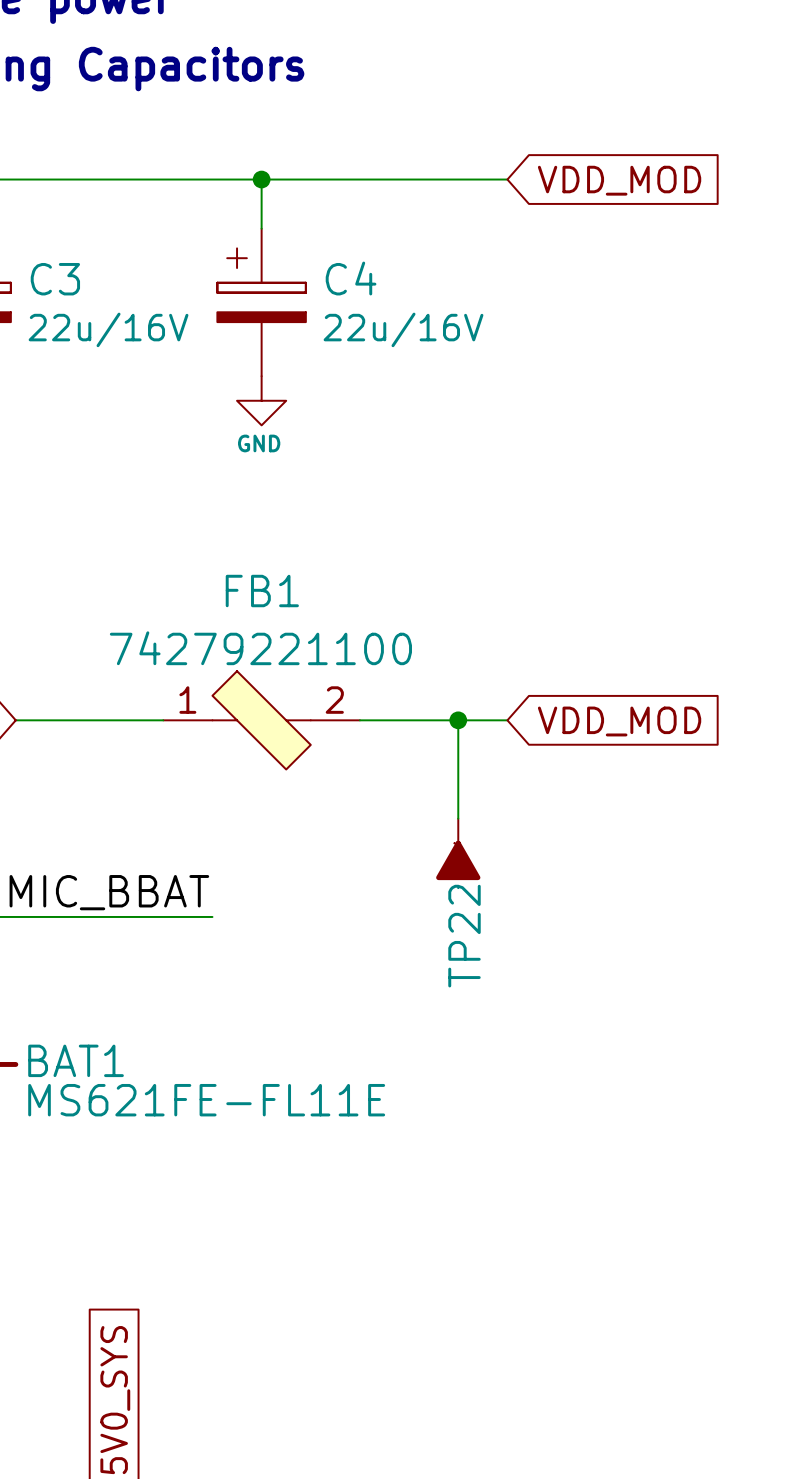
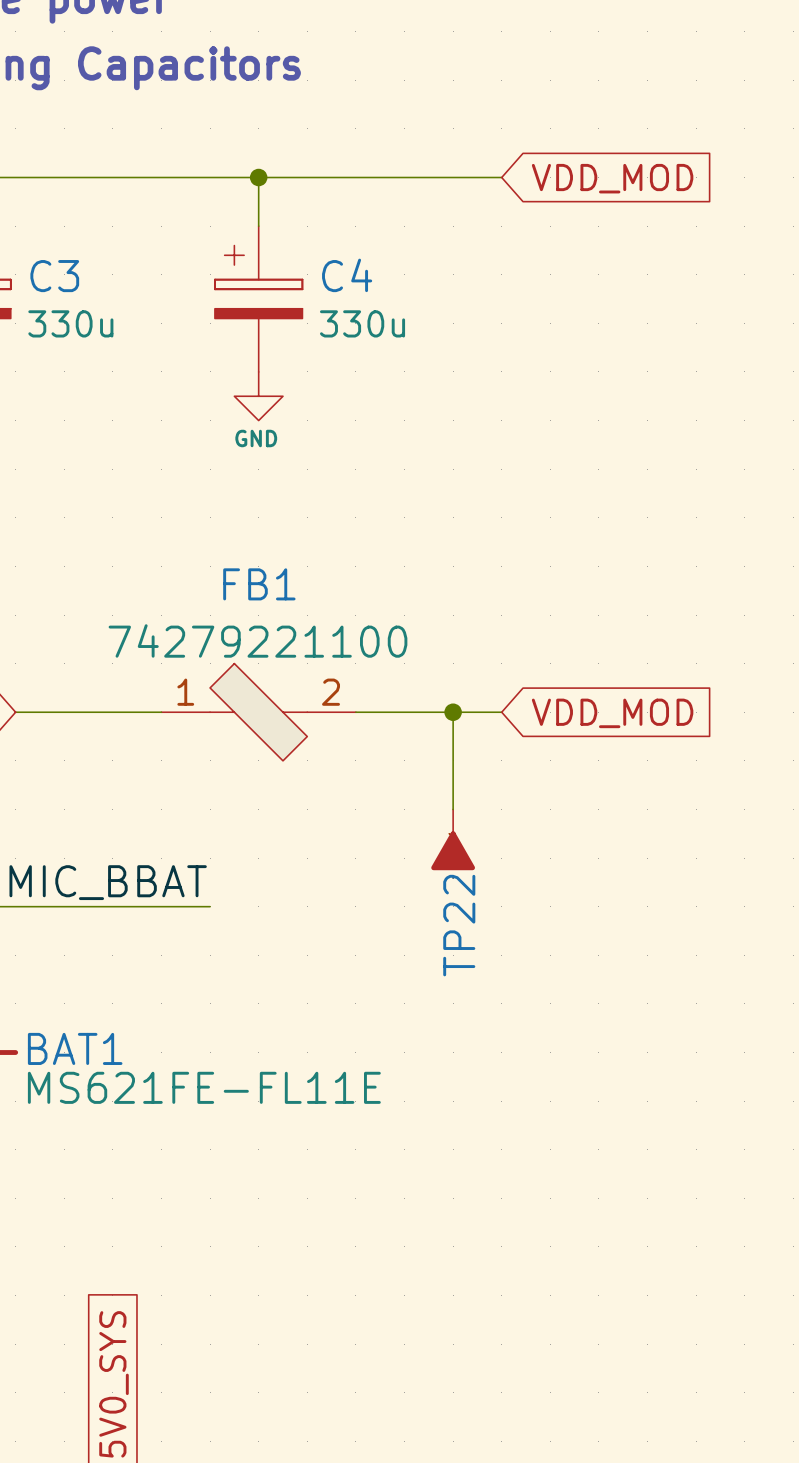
C3 text: 22u/16V (108, 329) -> 330u (70, 323)
C4 text: 22u/16V (403, 329) -> 330u (362, 323)

